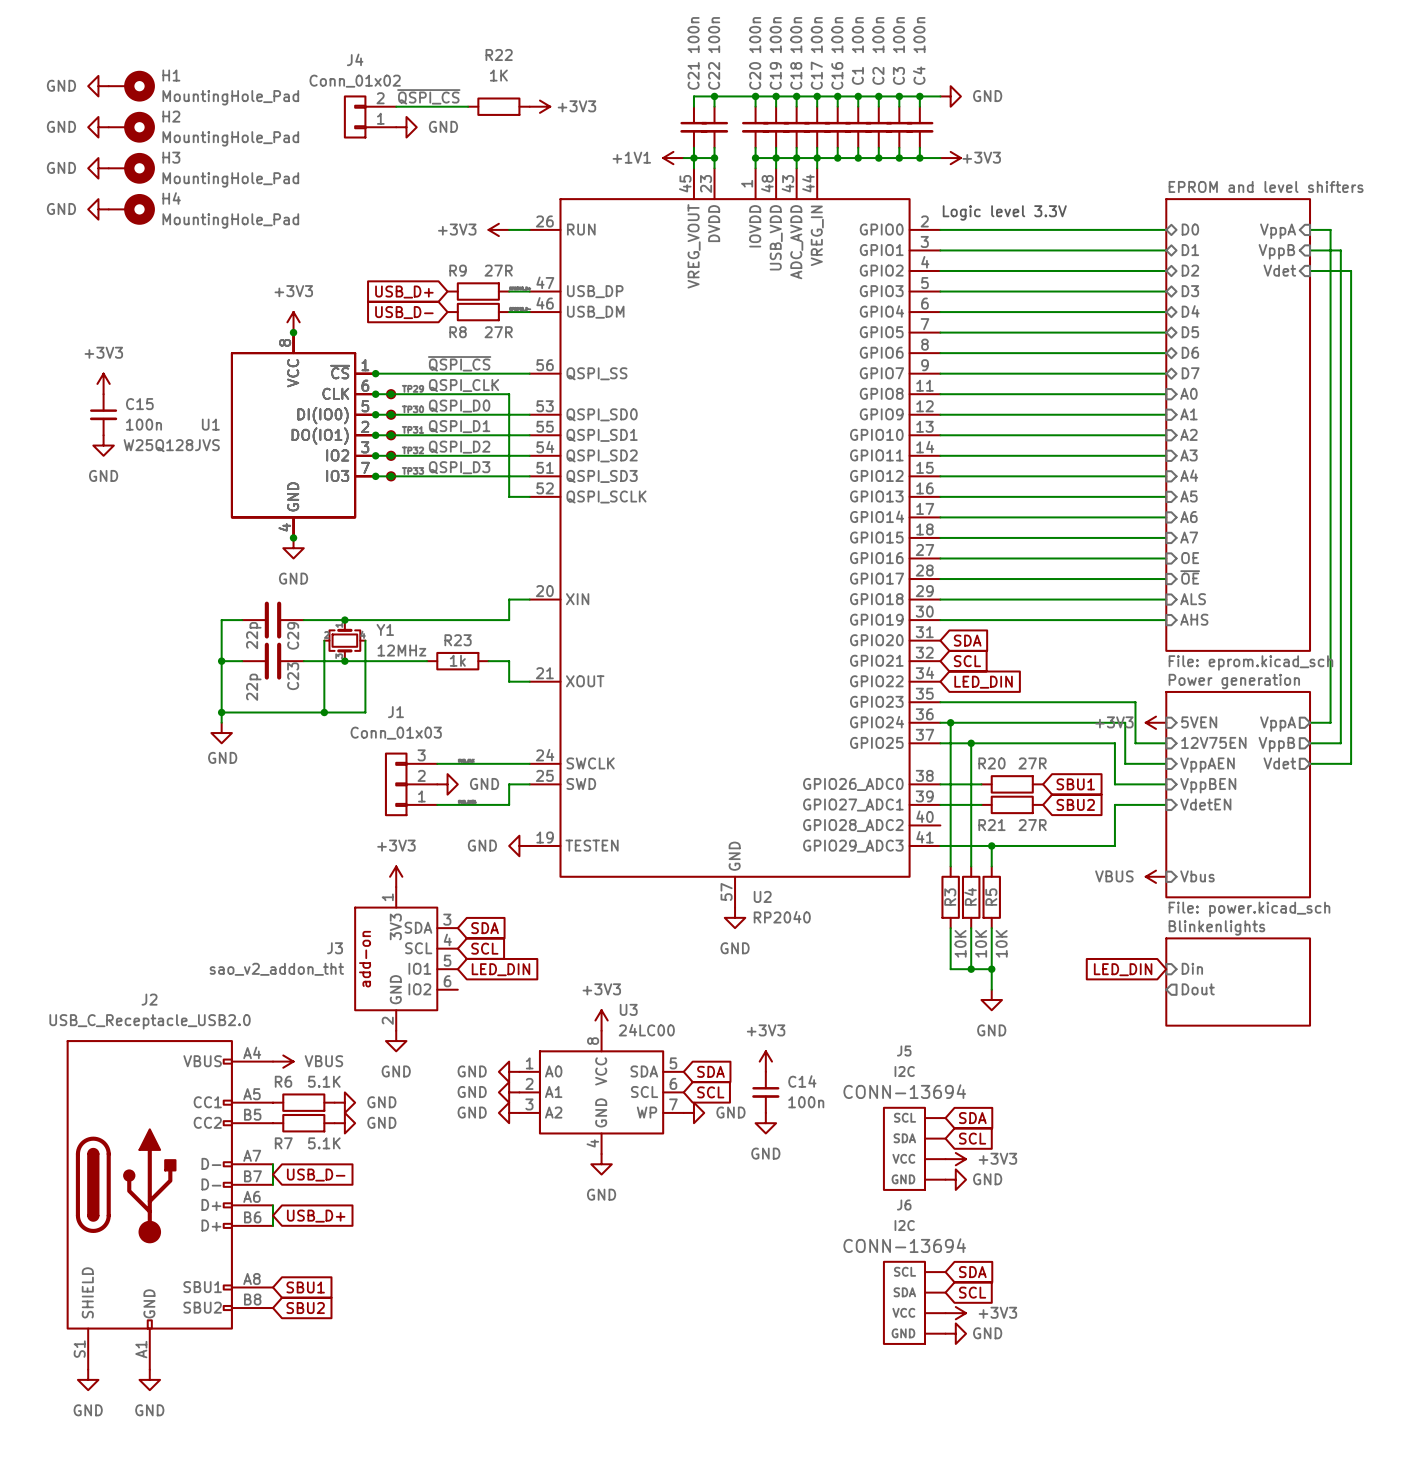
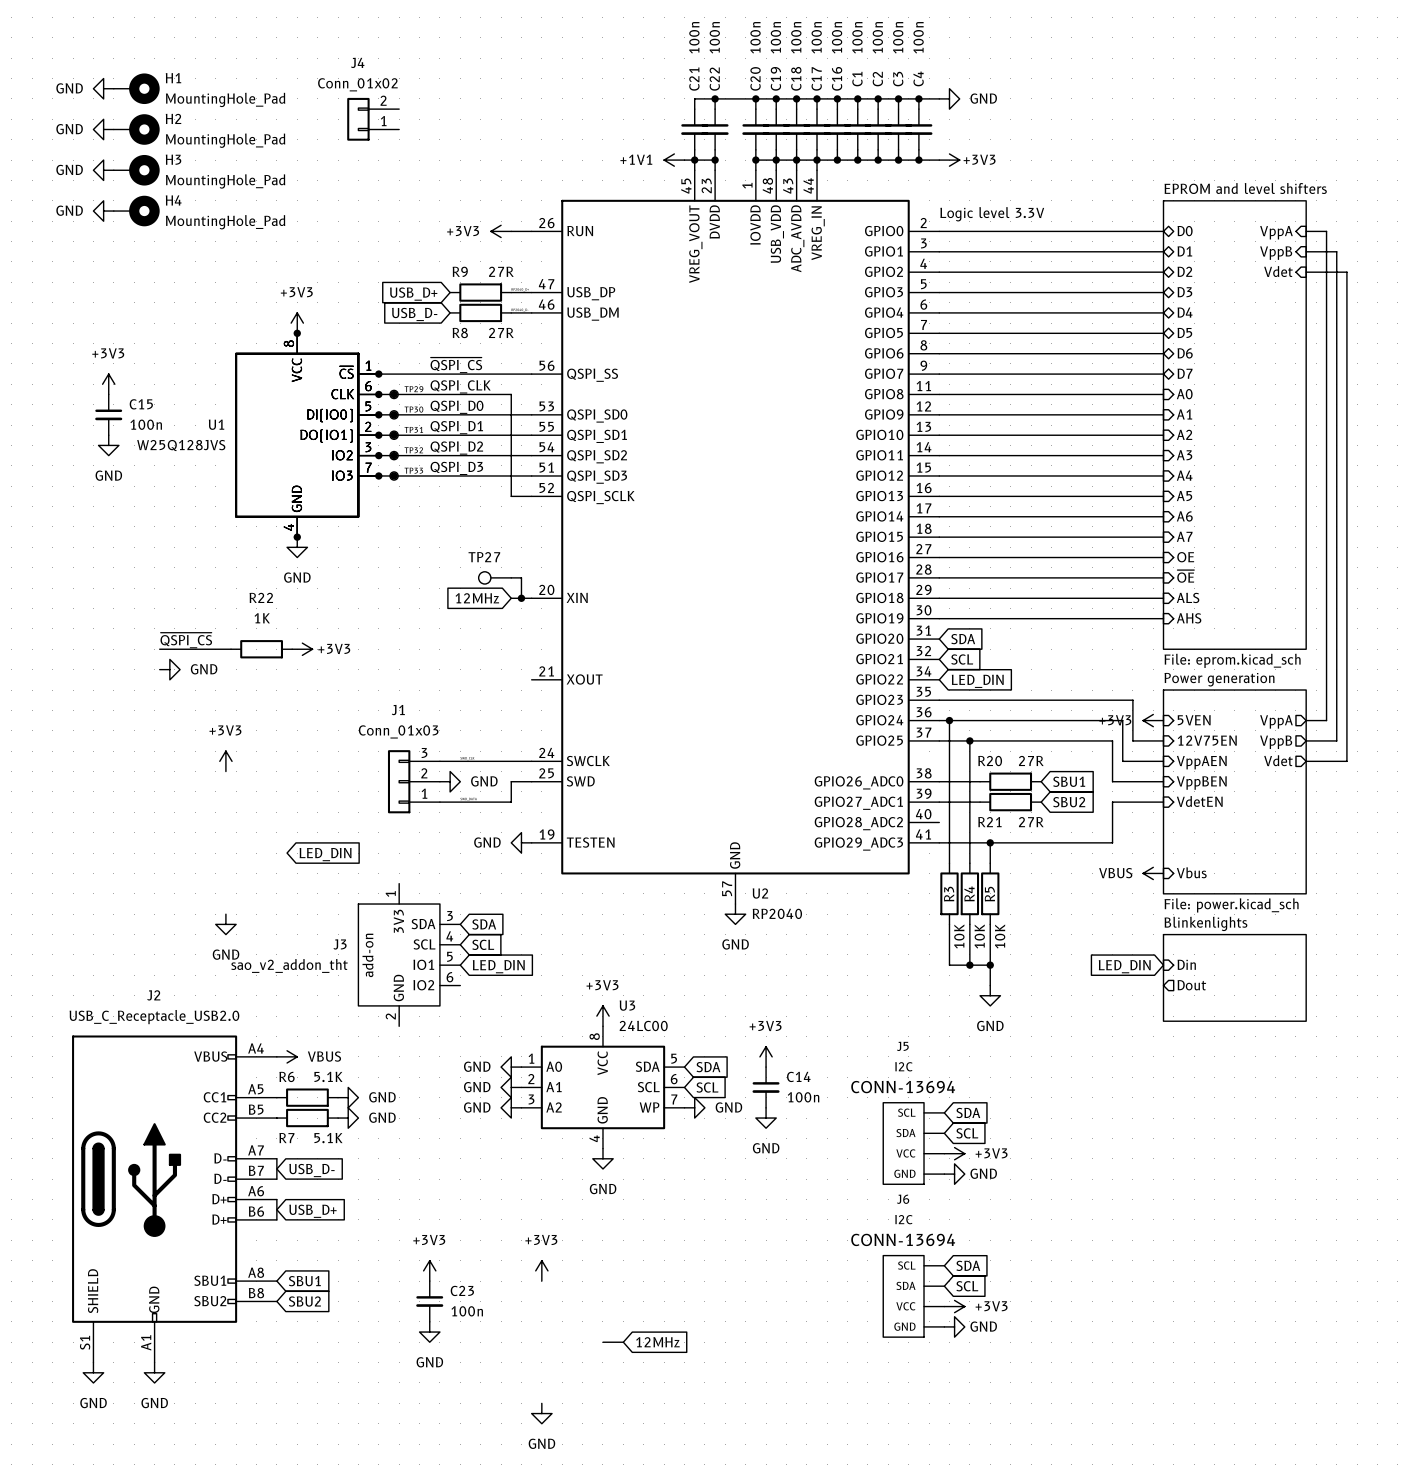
label: ~{QSPI_CS} (428, 96) -> none
wire: (396, 106) (468, 106) -> none
R22 position: (498, 106) -> (261, 649)
power symbol: +3V3 (539, 106) -> none
power symbol: GND (406, 127) -> none
TP27: none -> (494, 577)
wire: none -> (511, 577) (521, 577) (521, 598)
global label: none -> 12MHz (477, 598)
wire: (509, 599) (509, 620) (303, 620) -> none
junction: none -> (521, 598)
wire: (242, 620) (221, 620) (221, 722) -> none
C29: 22p (273, 620) -> none
junction: (344, 620) -> none
wire: (324, 640) (324, 712) -> none
Y1: 12MHz (344, 640) -> none
wire: (365, 640) (365, 712) (221, 712) -> none
label: none -> ~{QSPI_CS} (186, 640)
C23 symbol: [242, 642, 304, 680] -> [416, 1281, 444, 1322]
wire: none -> (159, 649) (231, 649)
power symbol: none -> +3V3 (302, 649)
wire: (221, 661) (242, 661) -> none
junction: (221, 661) -> none
wire: (303, 661) (427, 661) -> none
junction: (344, 661) -> none
R23: 1k (457, 661) -> none
wire: (488, 661) (509, 661) (509, 681) (529, 681) -> none
C23 name position: C23 (293, 676) -> C23 (462, 1290)
C23 value: 22p (253, 687) -> 100n (467, 1311)
junction: (221, 712) -> none
junction: (324, 712) -> none
power symbol rotation: 0° (221, 733) -> 90° counterclockwise (169, 669)
power symbol position: GND (221, 733) -> GND (169, 669)
power symbol: none -> +3V3 (225, 761)
global label: none -> LED_DIN (325, 854)
power symbol: +3V3 (396, 876) -> none
power symbol: none -> GND (225, 924)
power symbol: GND (396, 1041) -> none
power symbol: none -> +3V3 (429, 1270)
power symbol: none -> +3V3 (541, 1270)
power symbol: none -> GND (429, 1332)
wire: none -> (602, 1342) (623, 1342)
global label: none -> 12MHz (657, 1342)
power symbol: none -> GND (541, 1413)

